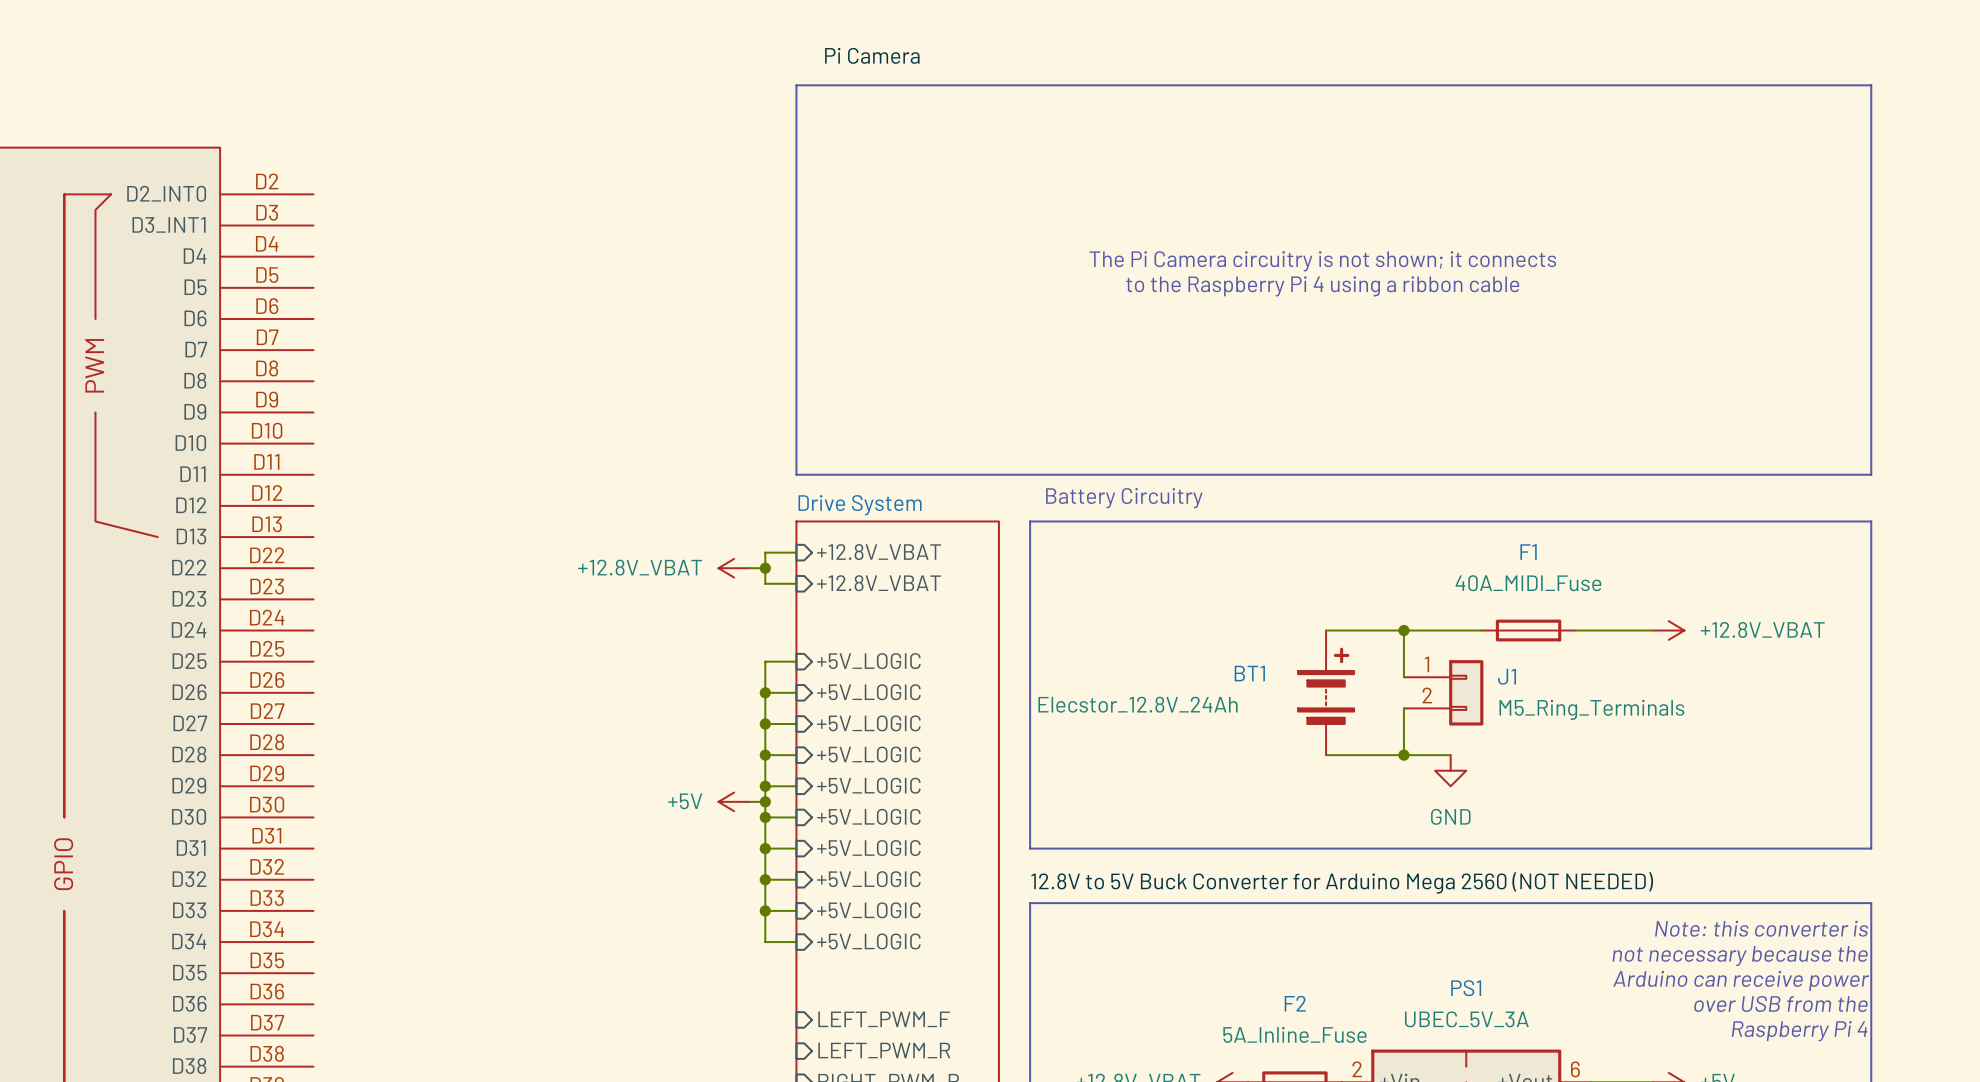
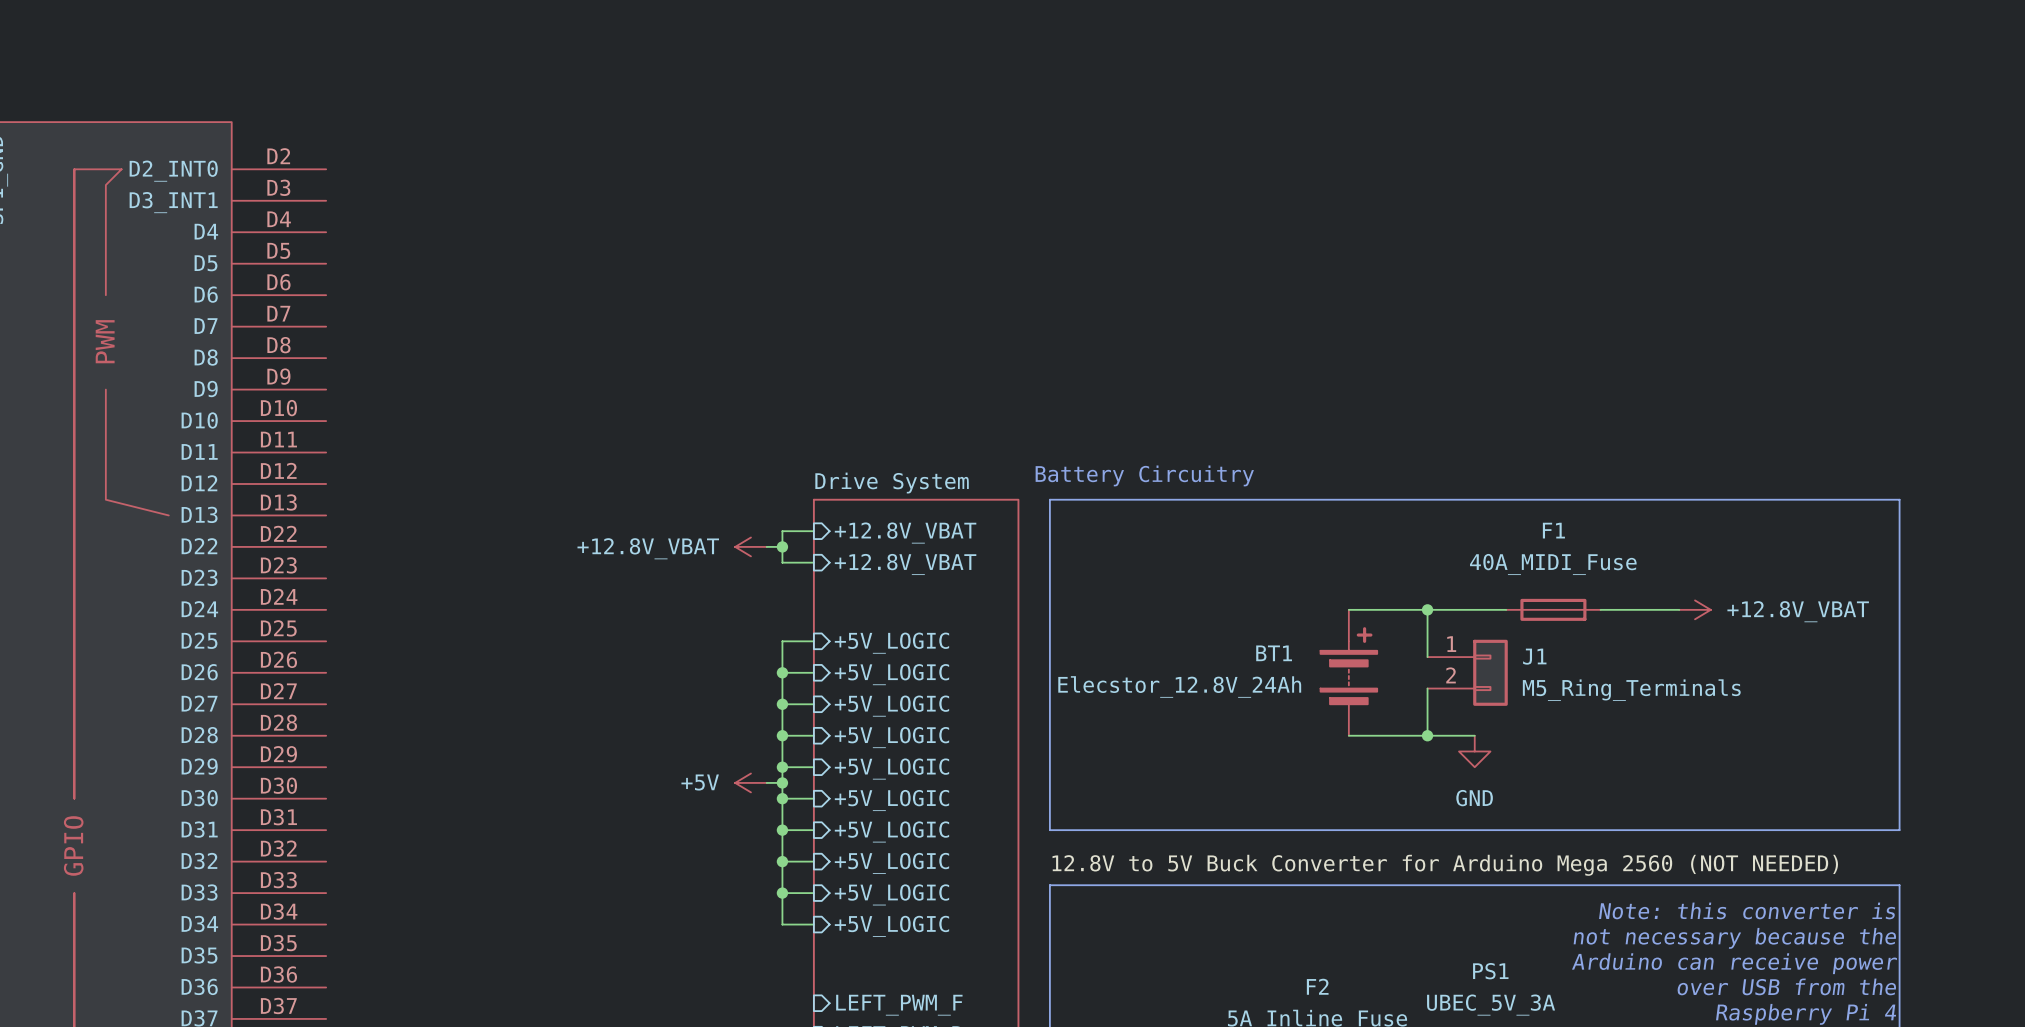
label: Pi Camera (872, 55) -> none
line: (796, 85) (1871, 85) (1871, 474) (796, 474) (796, 85) -> none
text: The Pi Camera circuitry is not shown; it connects (1322, 261) -> none
text: to the Raspberry Pi 4 using a ribbon cable (1322, 286) -> none

